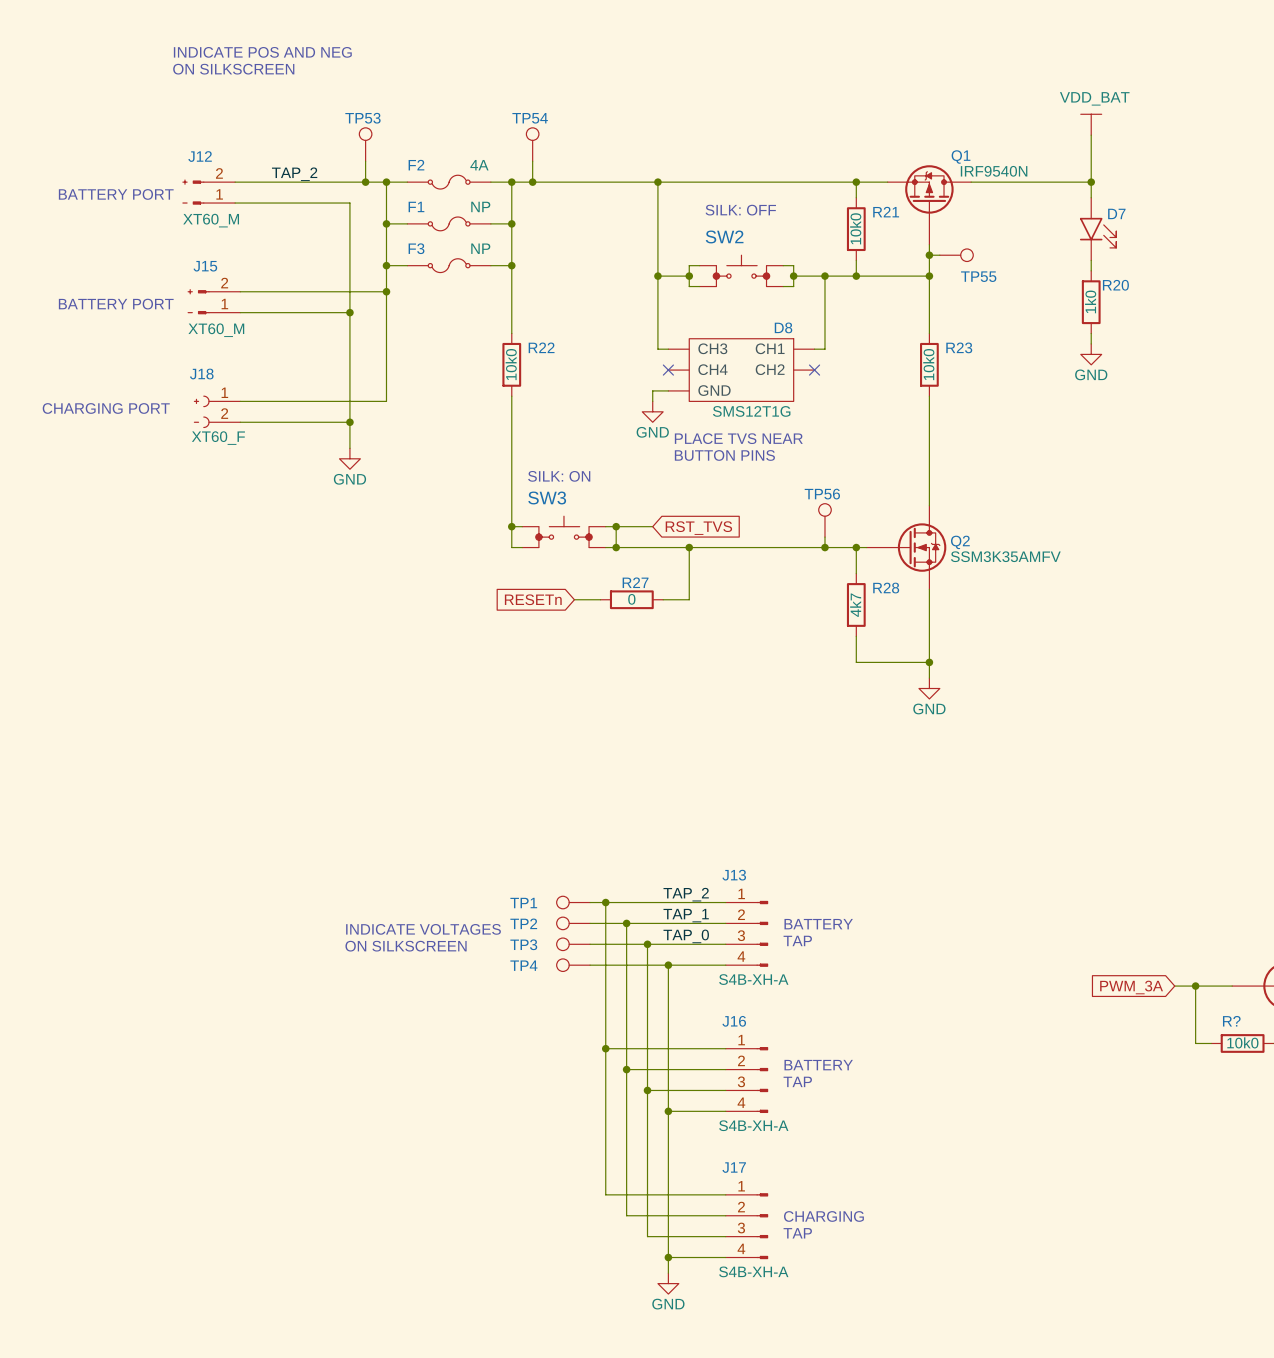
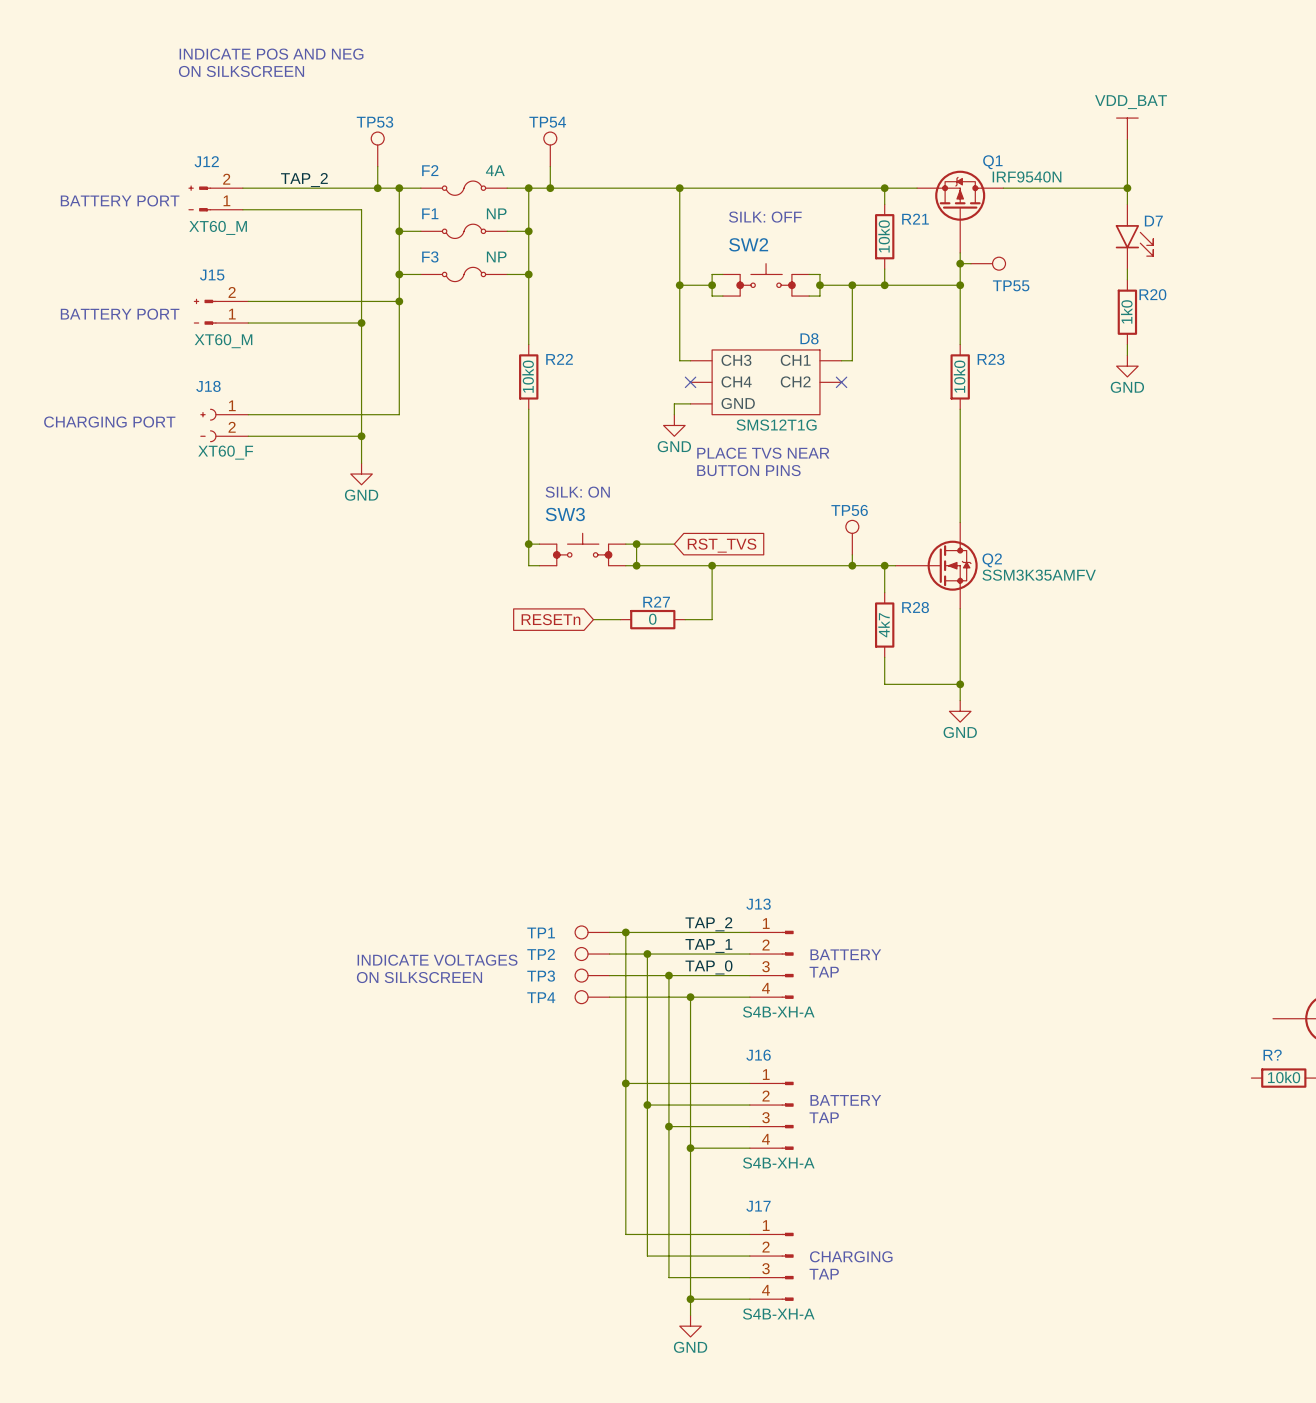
wire: (1174, 986) (1232, 986) -> none
wire: (1195, 986) (1195, 1043) (1211, 1043) -> none
junction: (1195, 986) -> none
global label: PWM_3A (1131, 987) -> none

